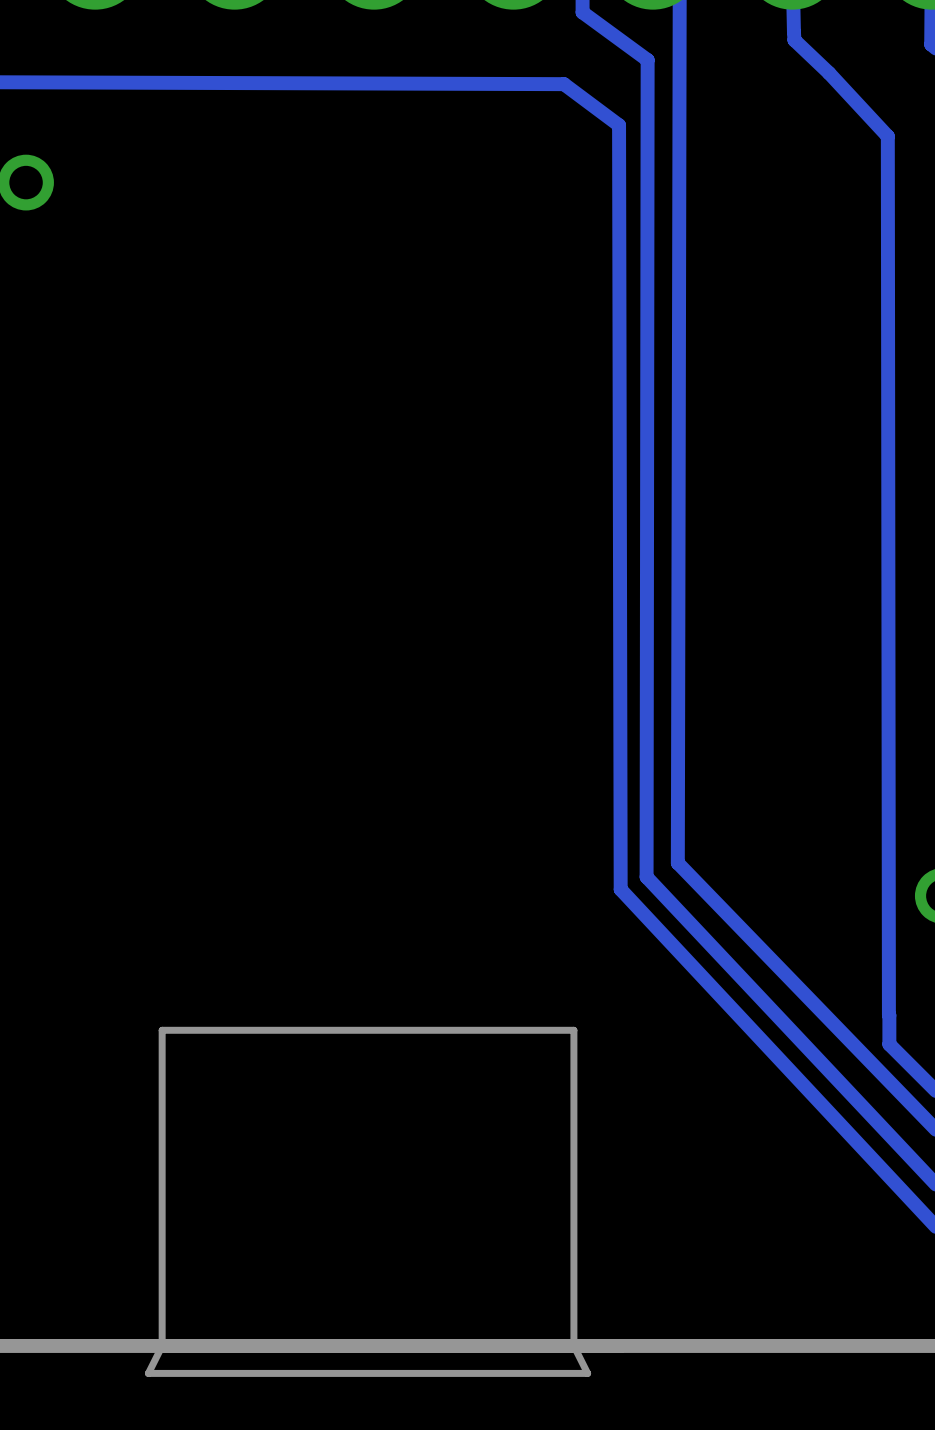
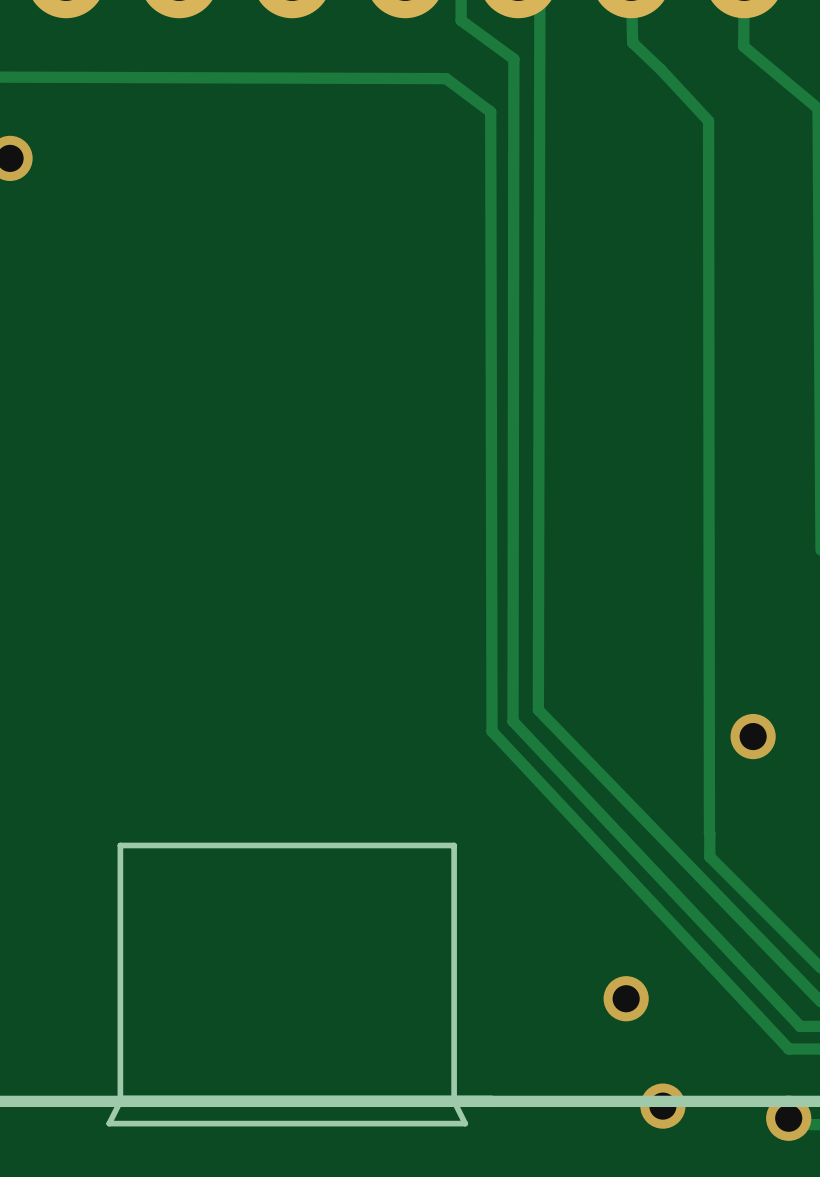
via: none -> (626, 998)
via: none -> (662, 1106)

